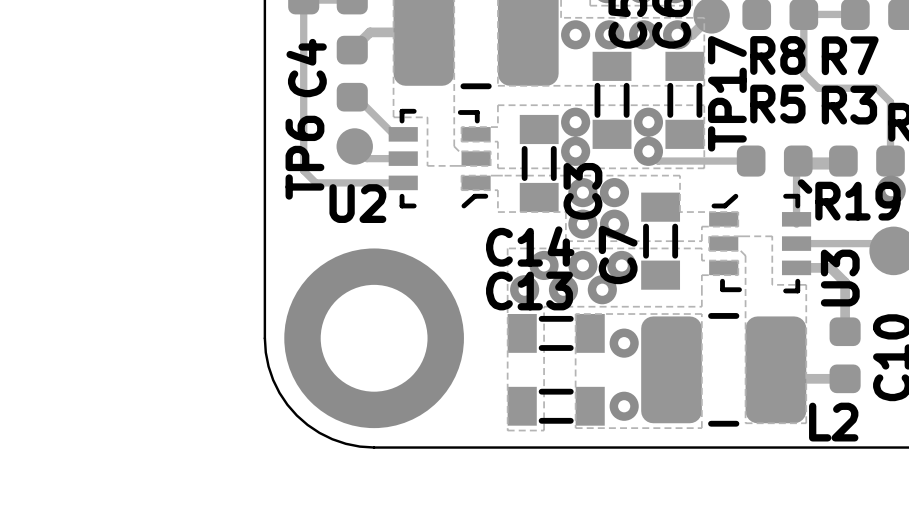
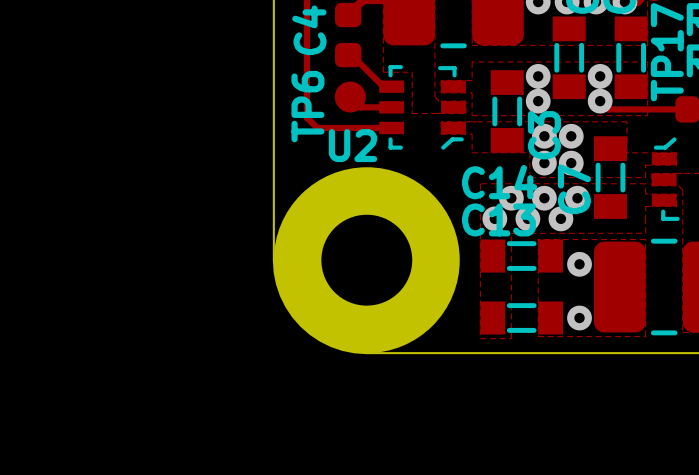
part footprint: [284, 248, 464, 429] -> [273, 167, 460, 354]

